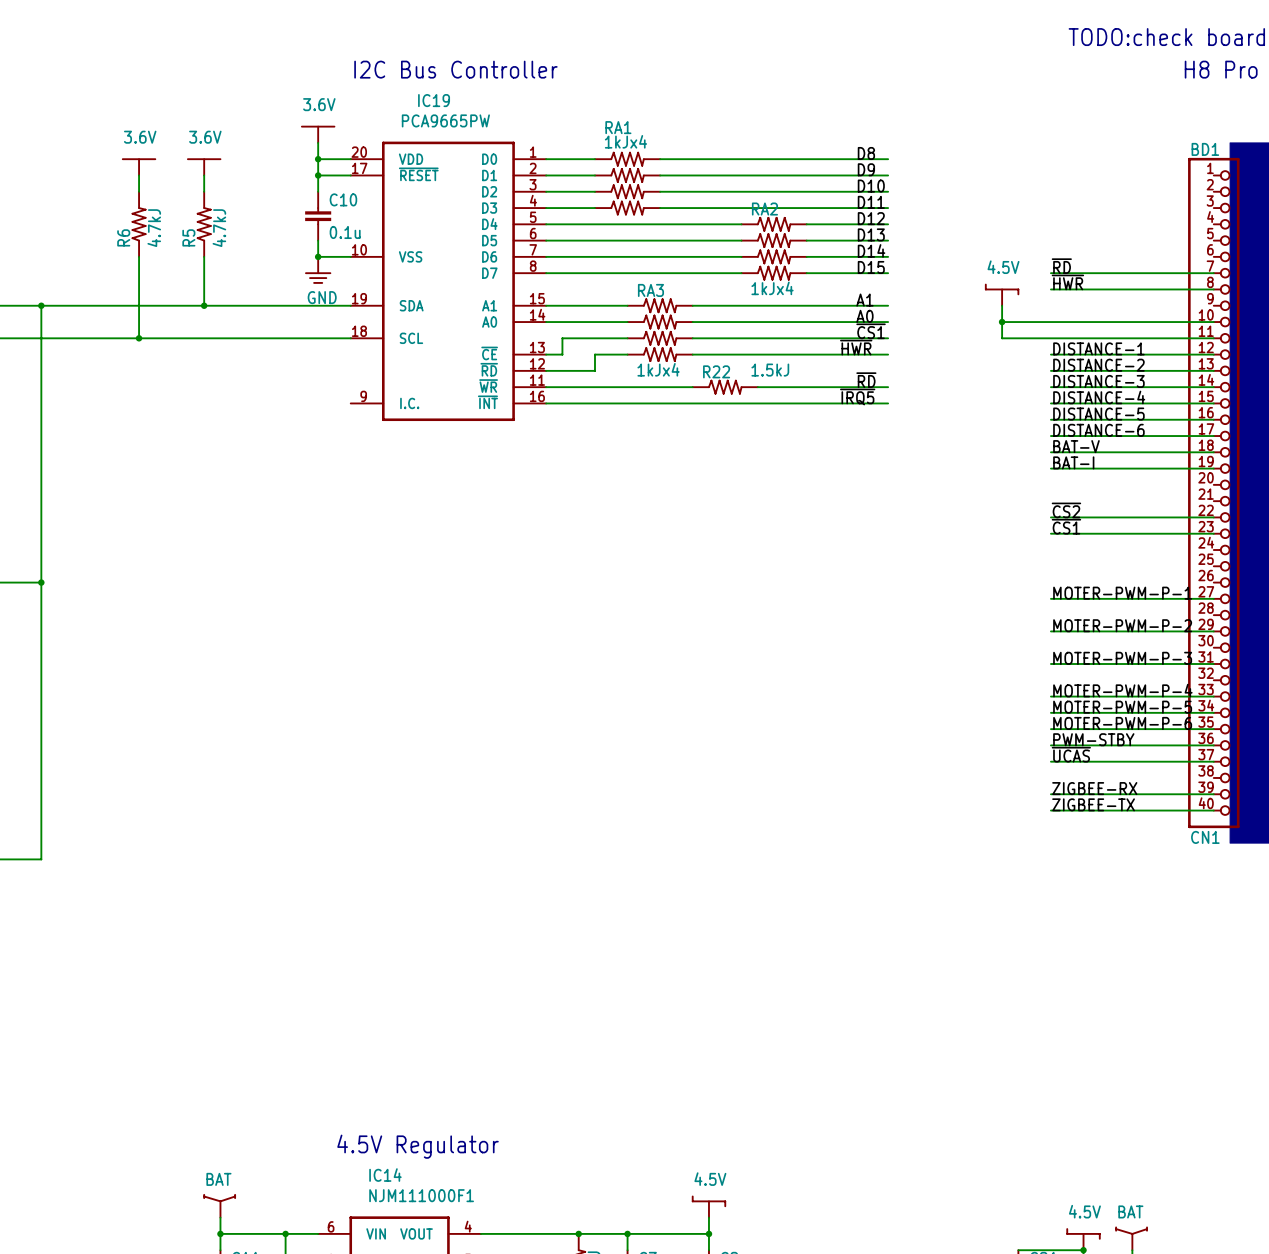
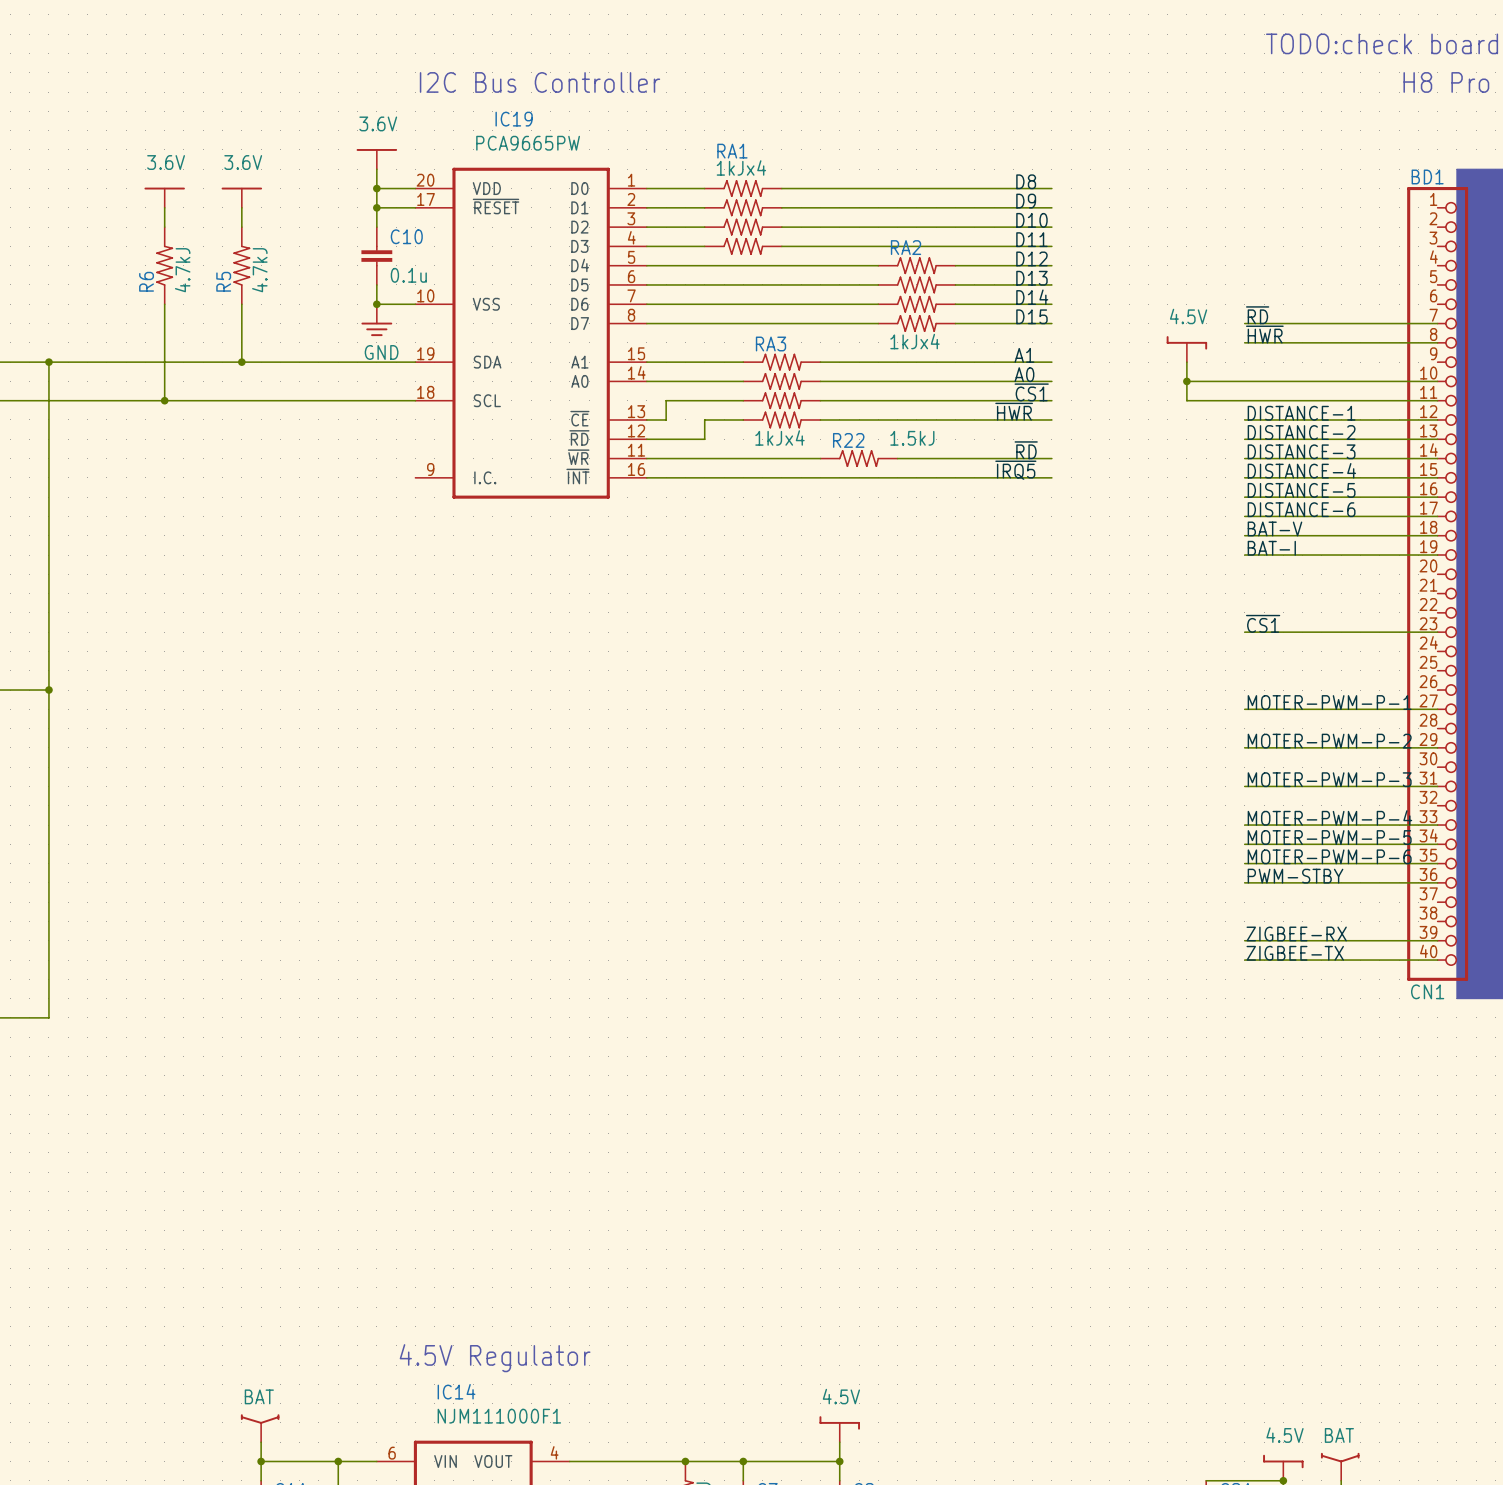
label: ~{CS2} (1066, 510) -> none
wire: (1050, 517) (1213, 517) -> none
label: ~{UCAS} (1071, 754) -> none
wire: (1050, 761) (1213, 761) -> none

